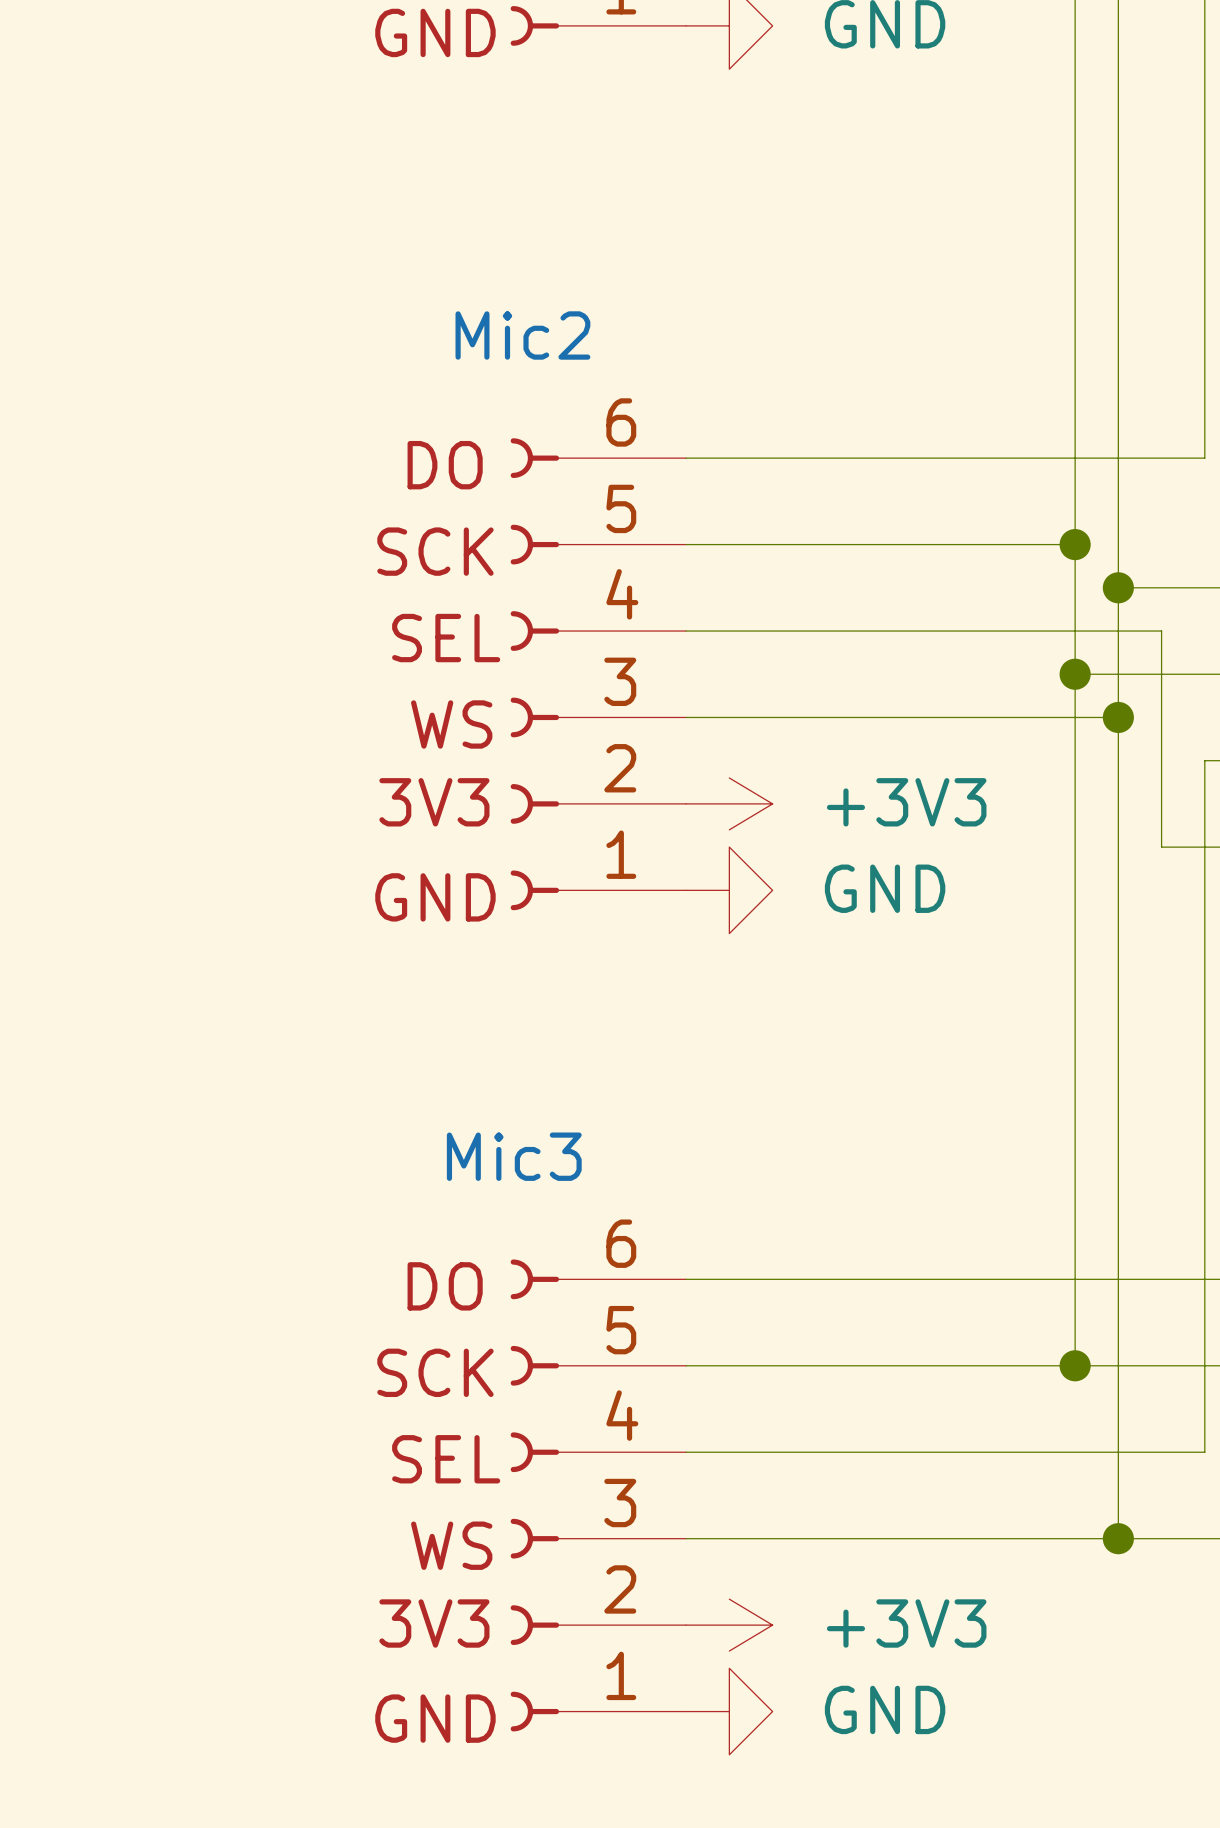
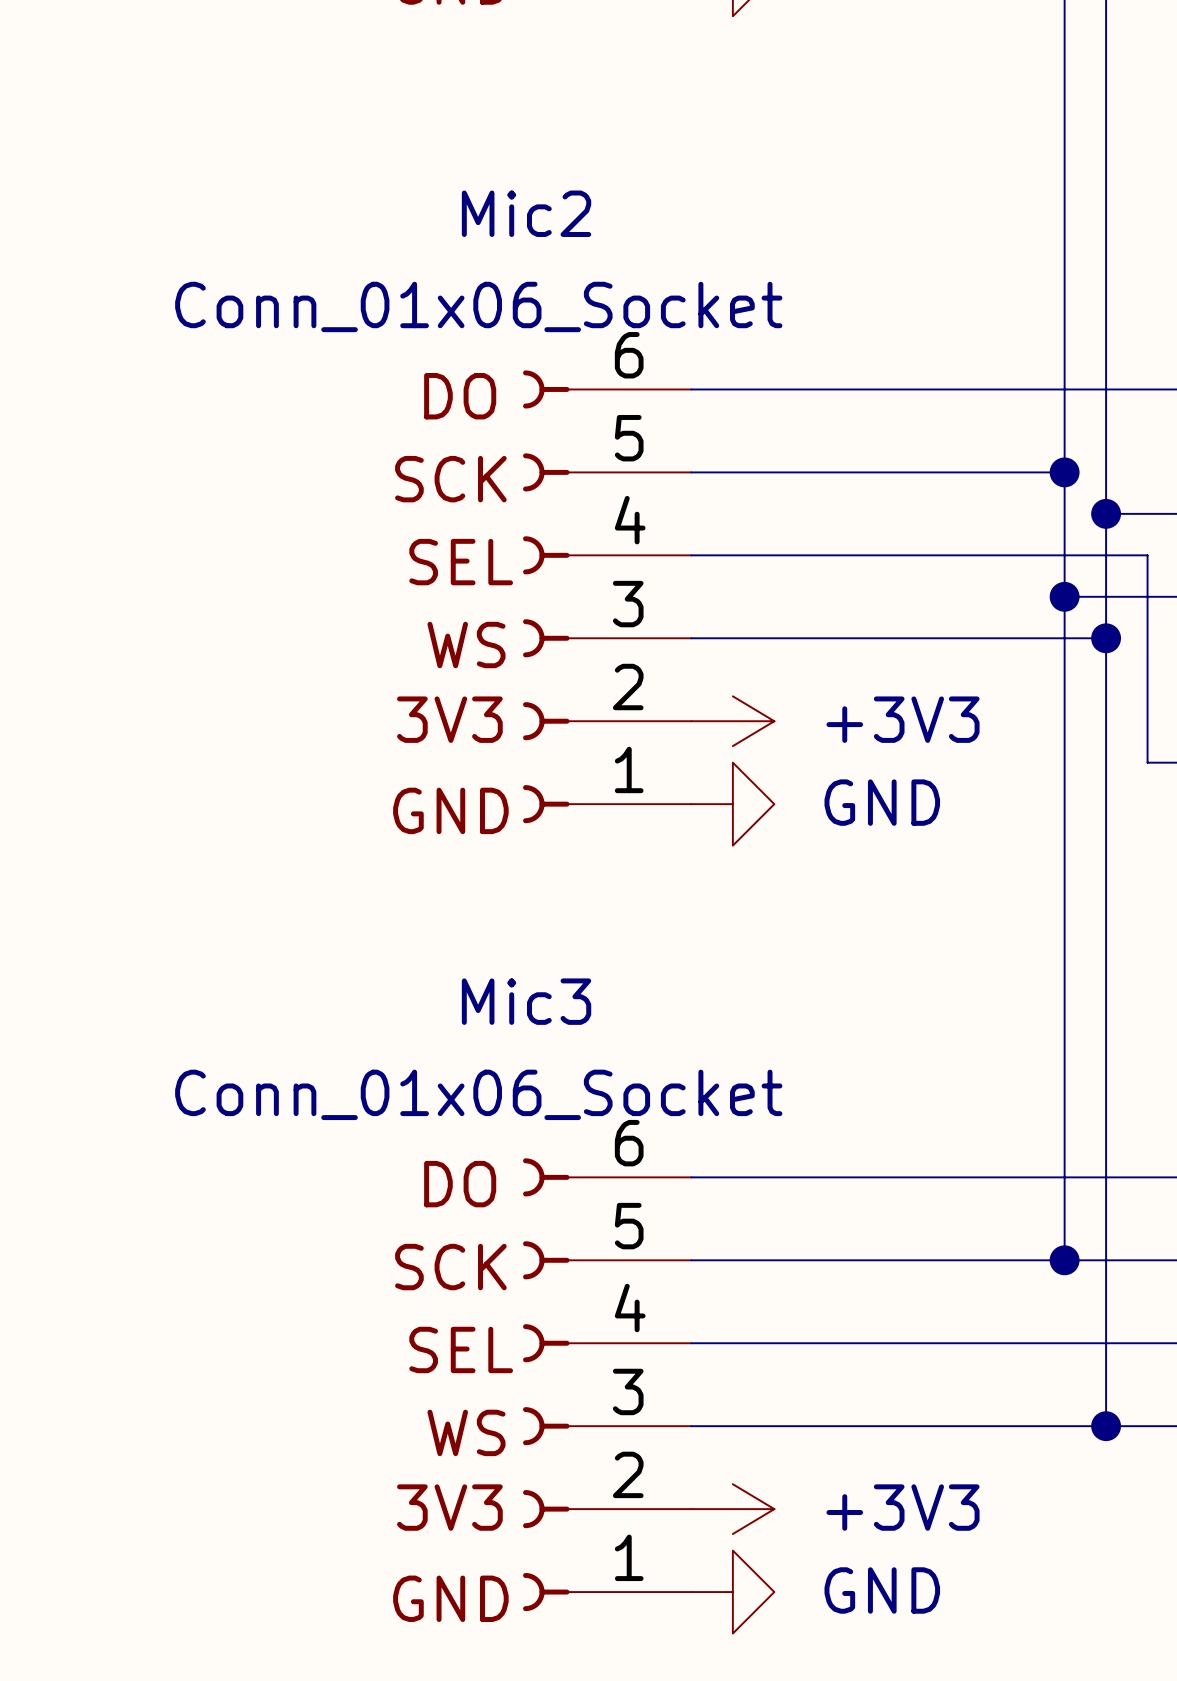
Mic2 name position: Mic2 (522, 335) -> Mic2 (526, 213)
Mic2 value: none -> Conn_01x06_Socket (478, 306)
Mic3 name position: Mic3 (514, 1156) -> Mic3 (526, 1001)
Mic3 value: none -> Conn_01x06_Socket (478, 1094)

